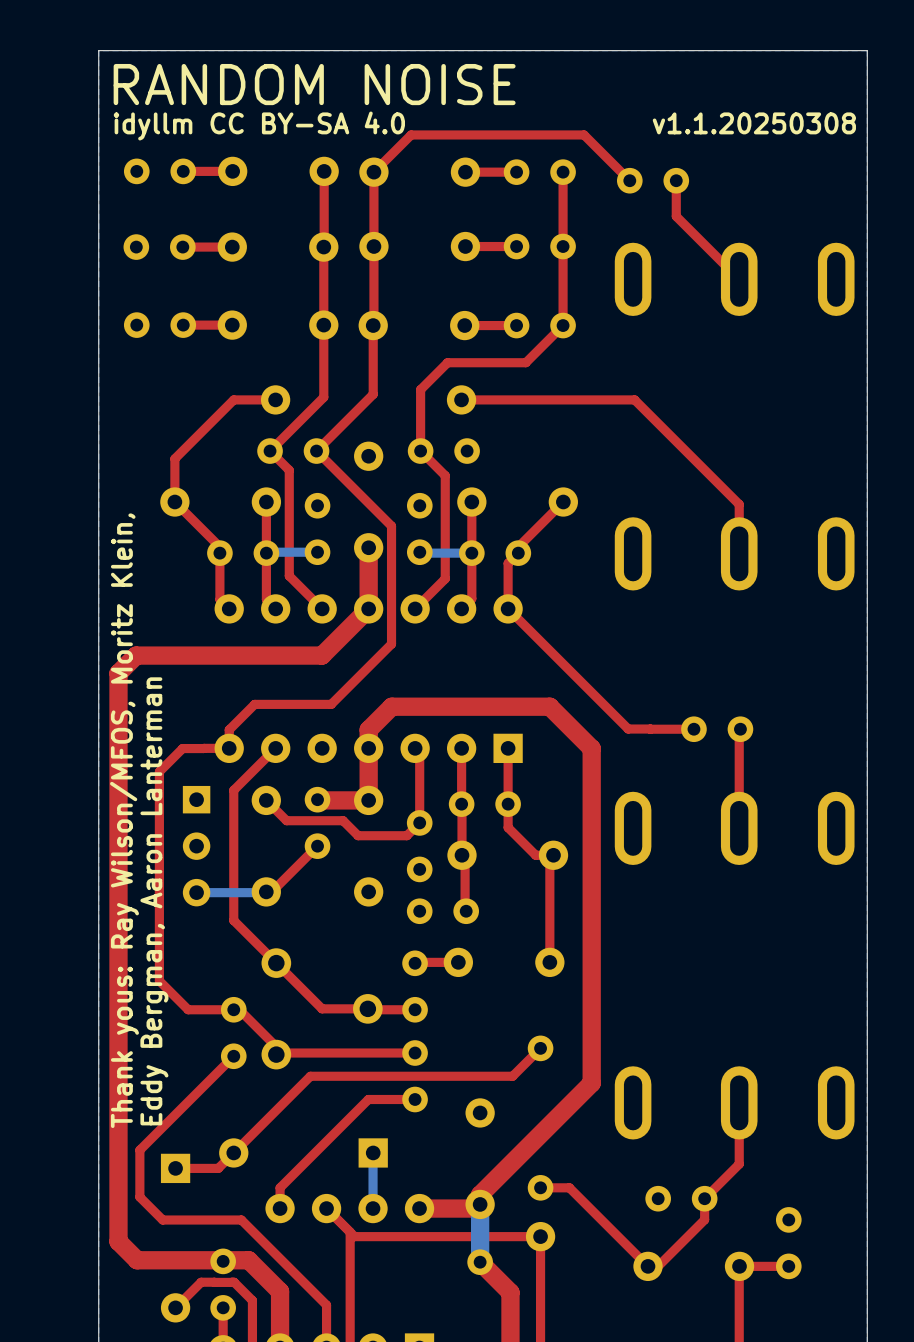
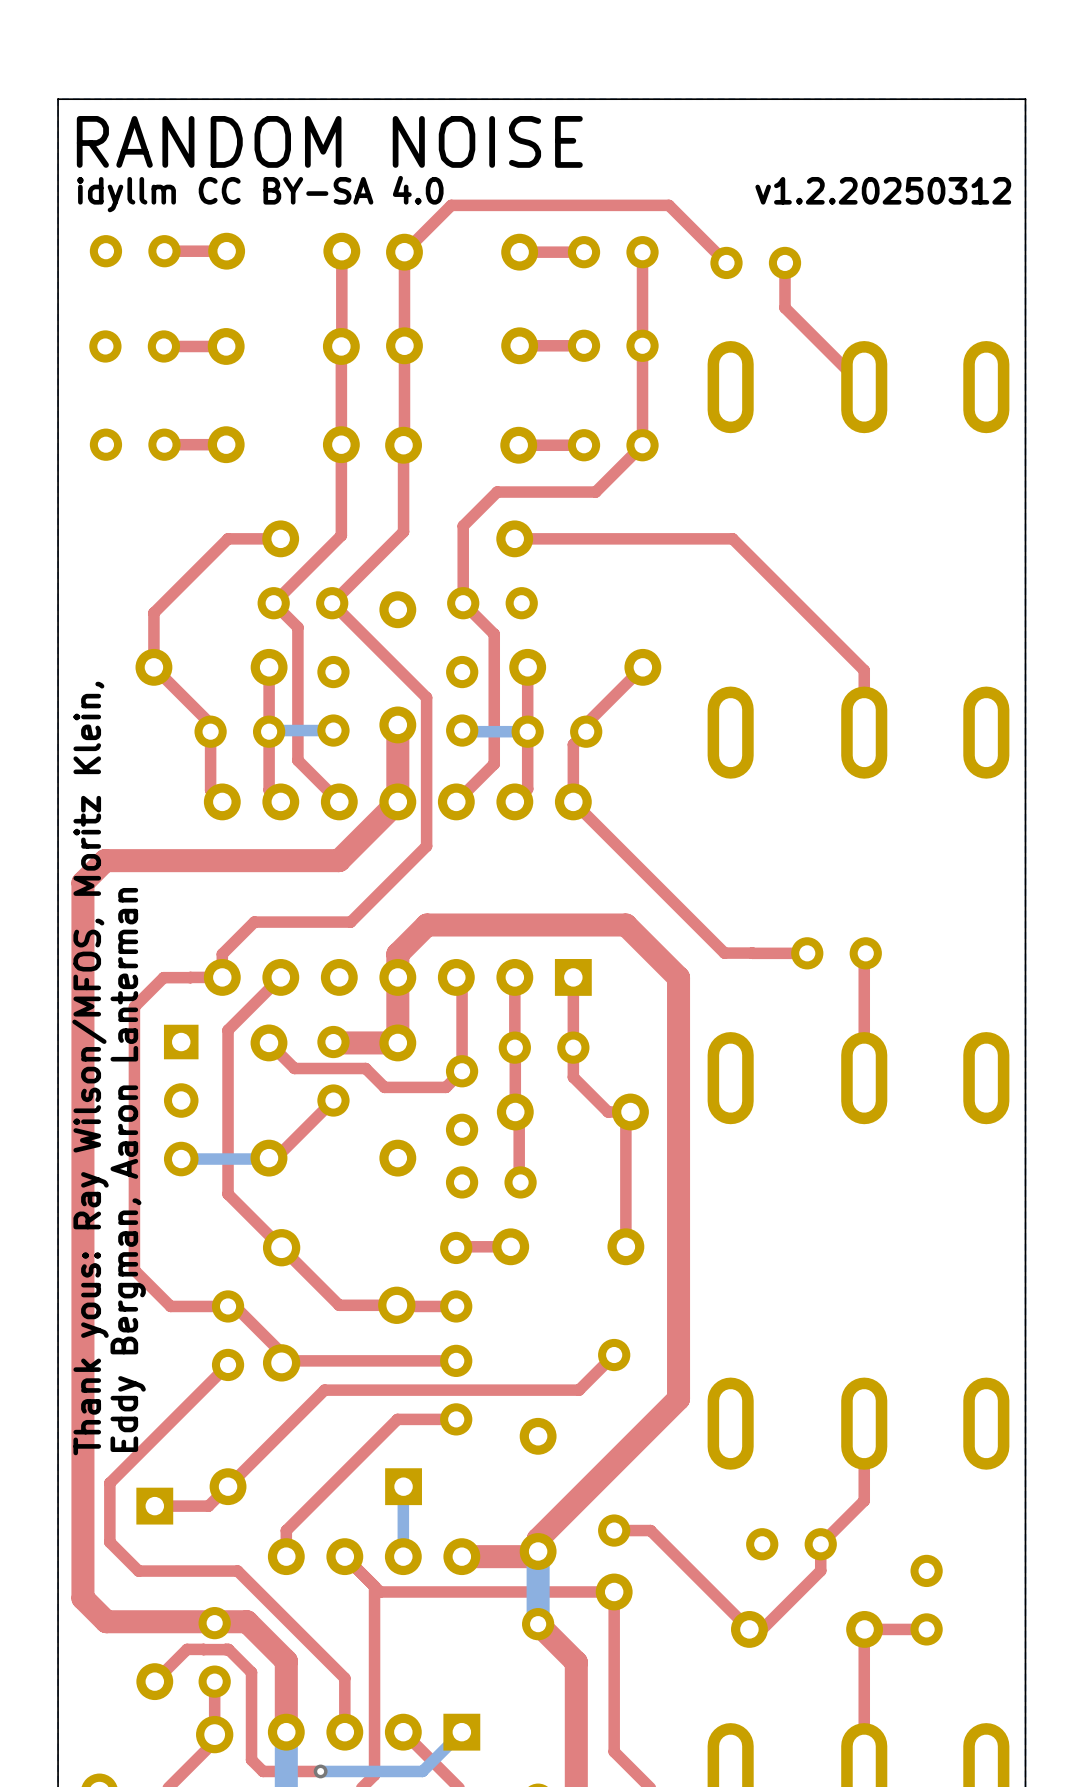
text: v1.1.20250308 (754, 123) -> v1.2.20250312 (883, 190)

